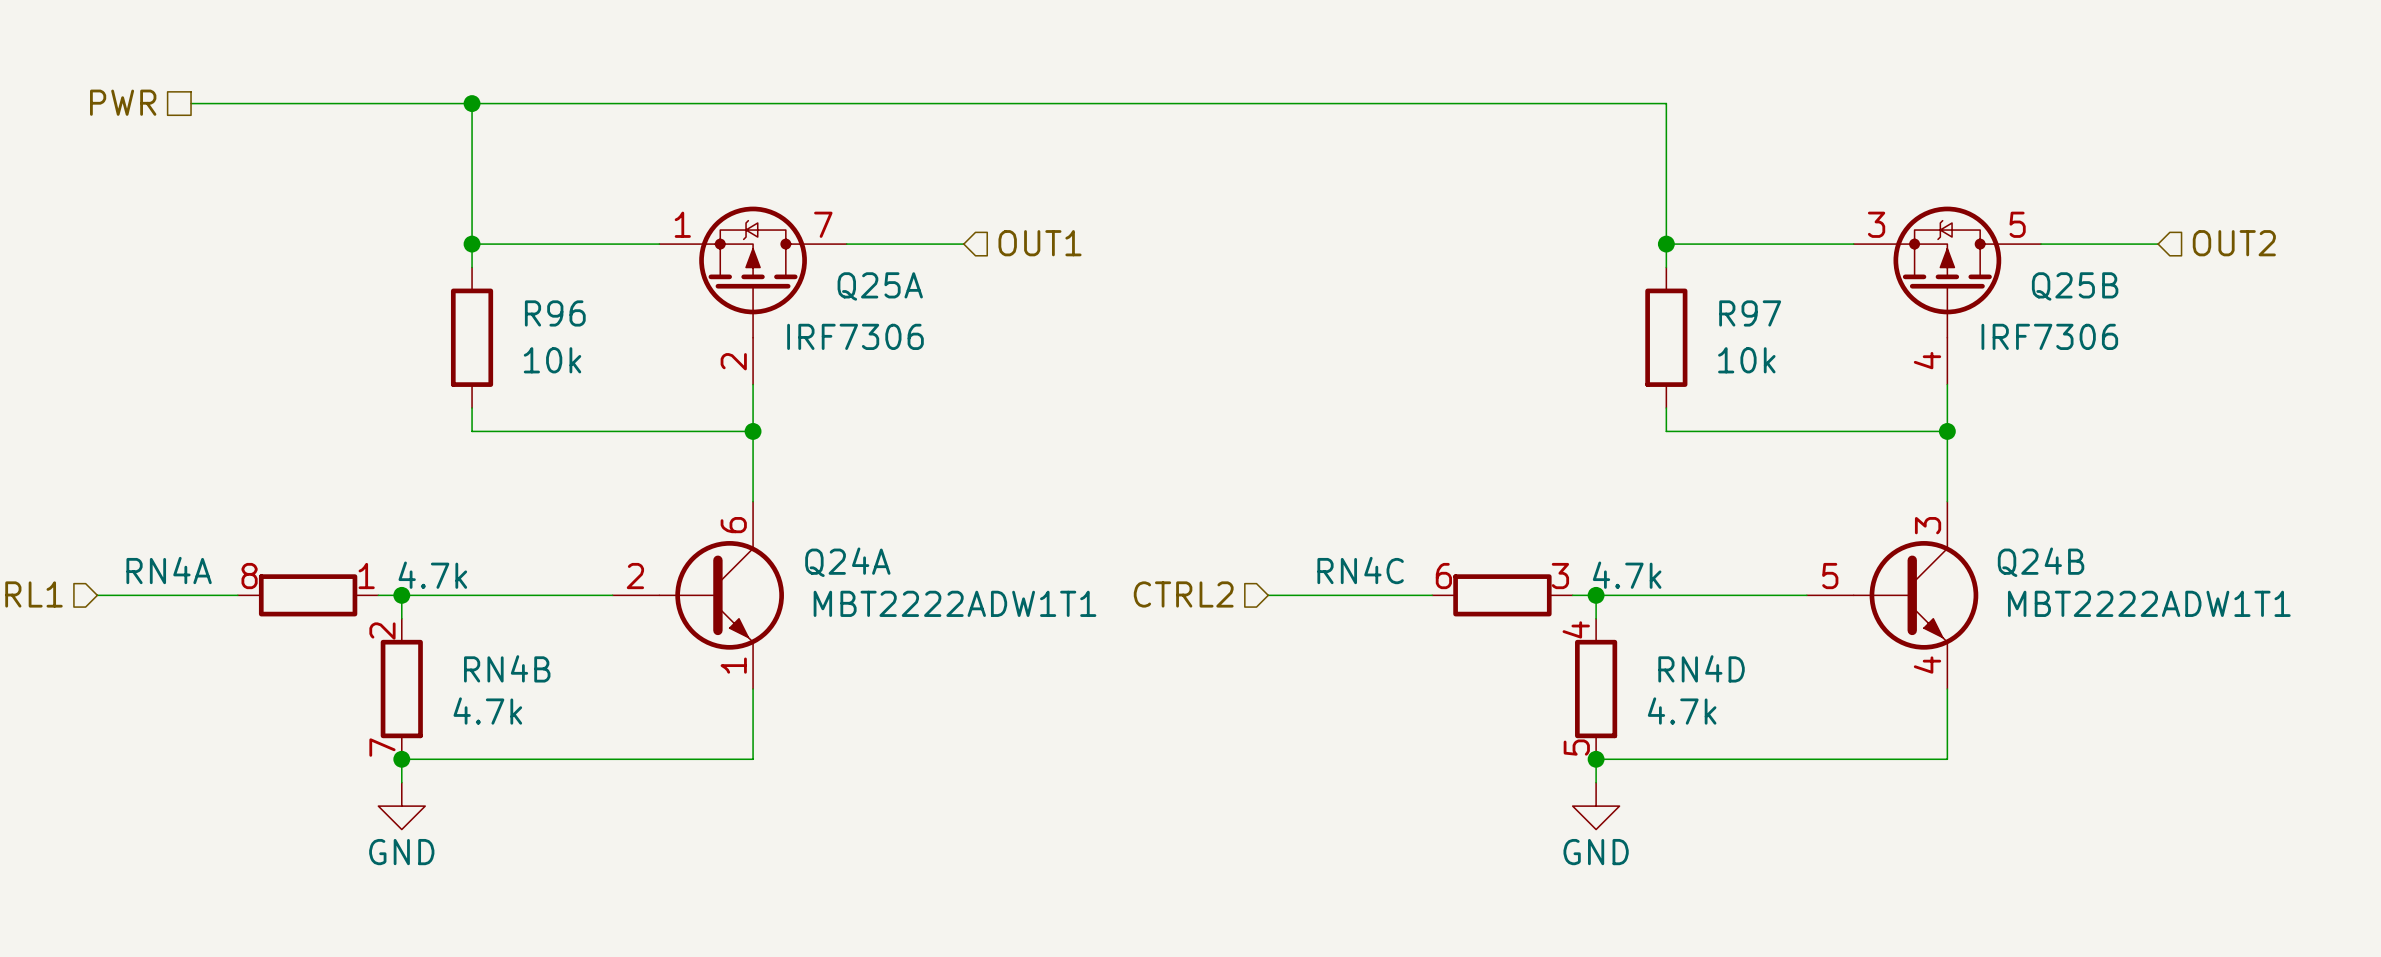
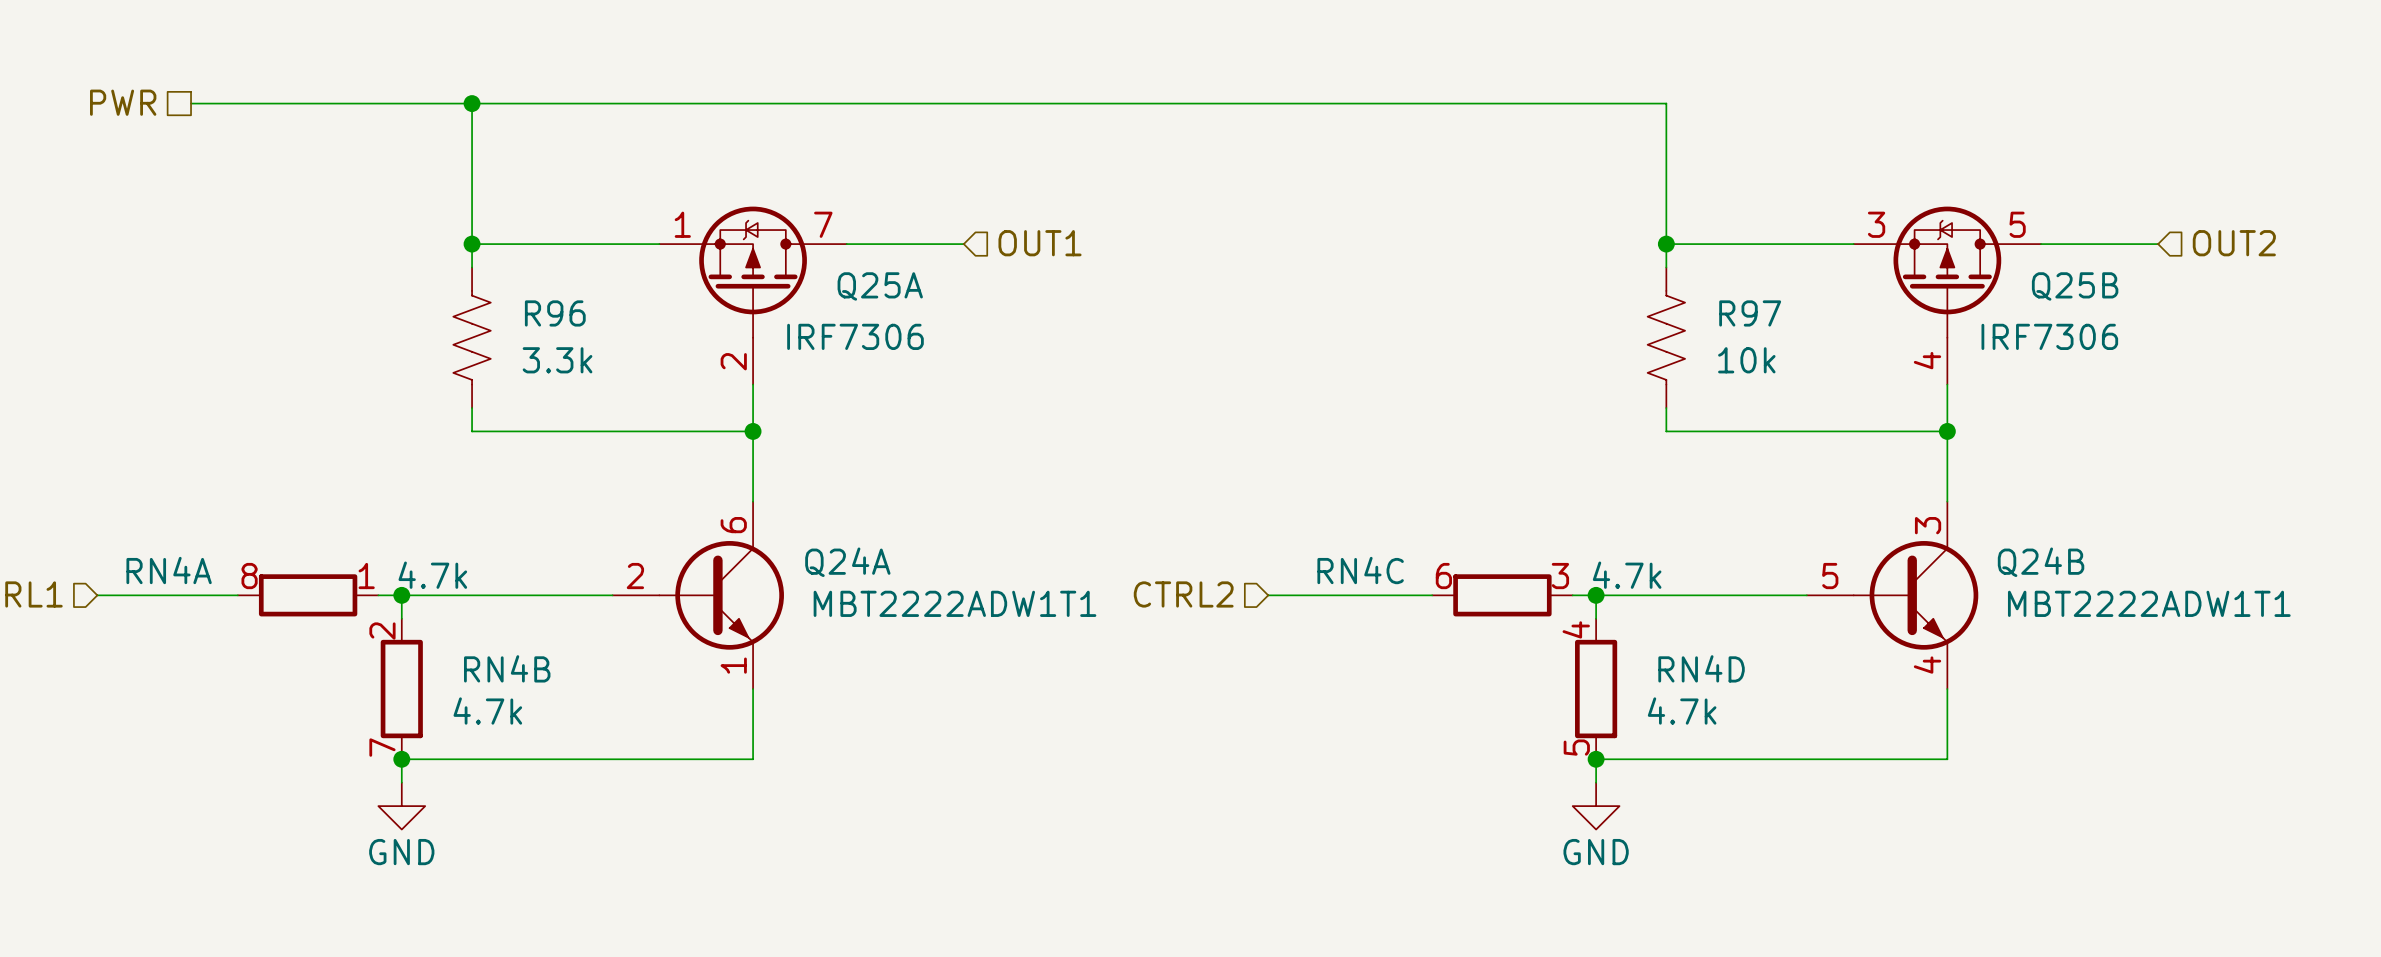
R96 symbol: [450, 267, 494, 409] -> [453, 267, 491, 409]
R97 symbol: [1645, 267, 1688, 409] -> [1647, 267, 1686, 409]
R96 value: 10k (552, 360) -> 3.3k (557, 360)

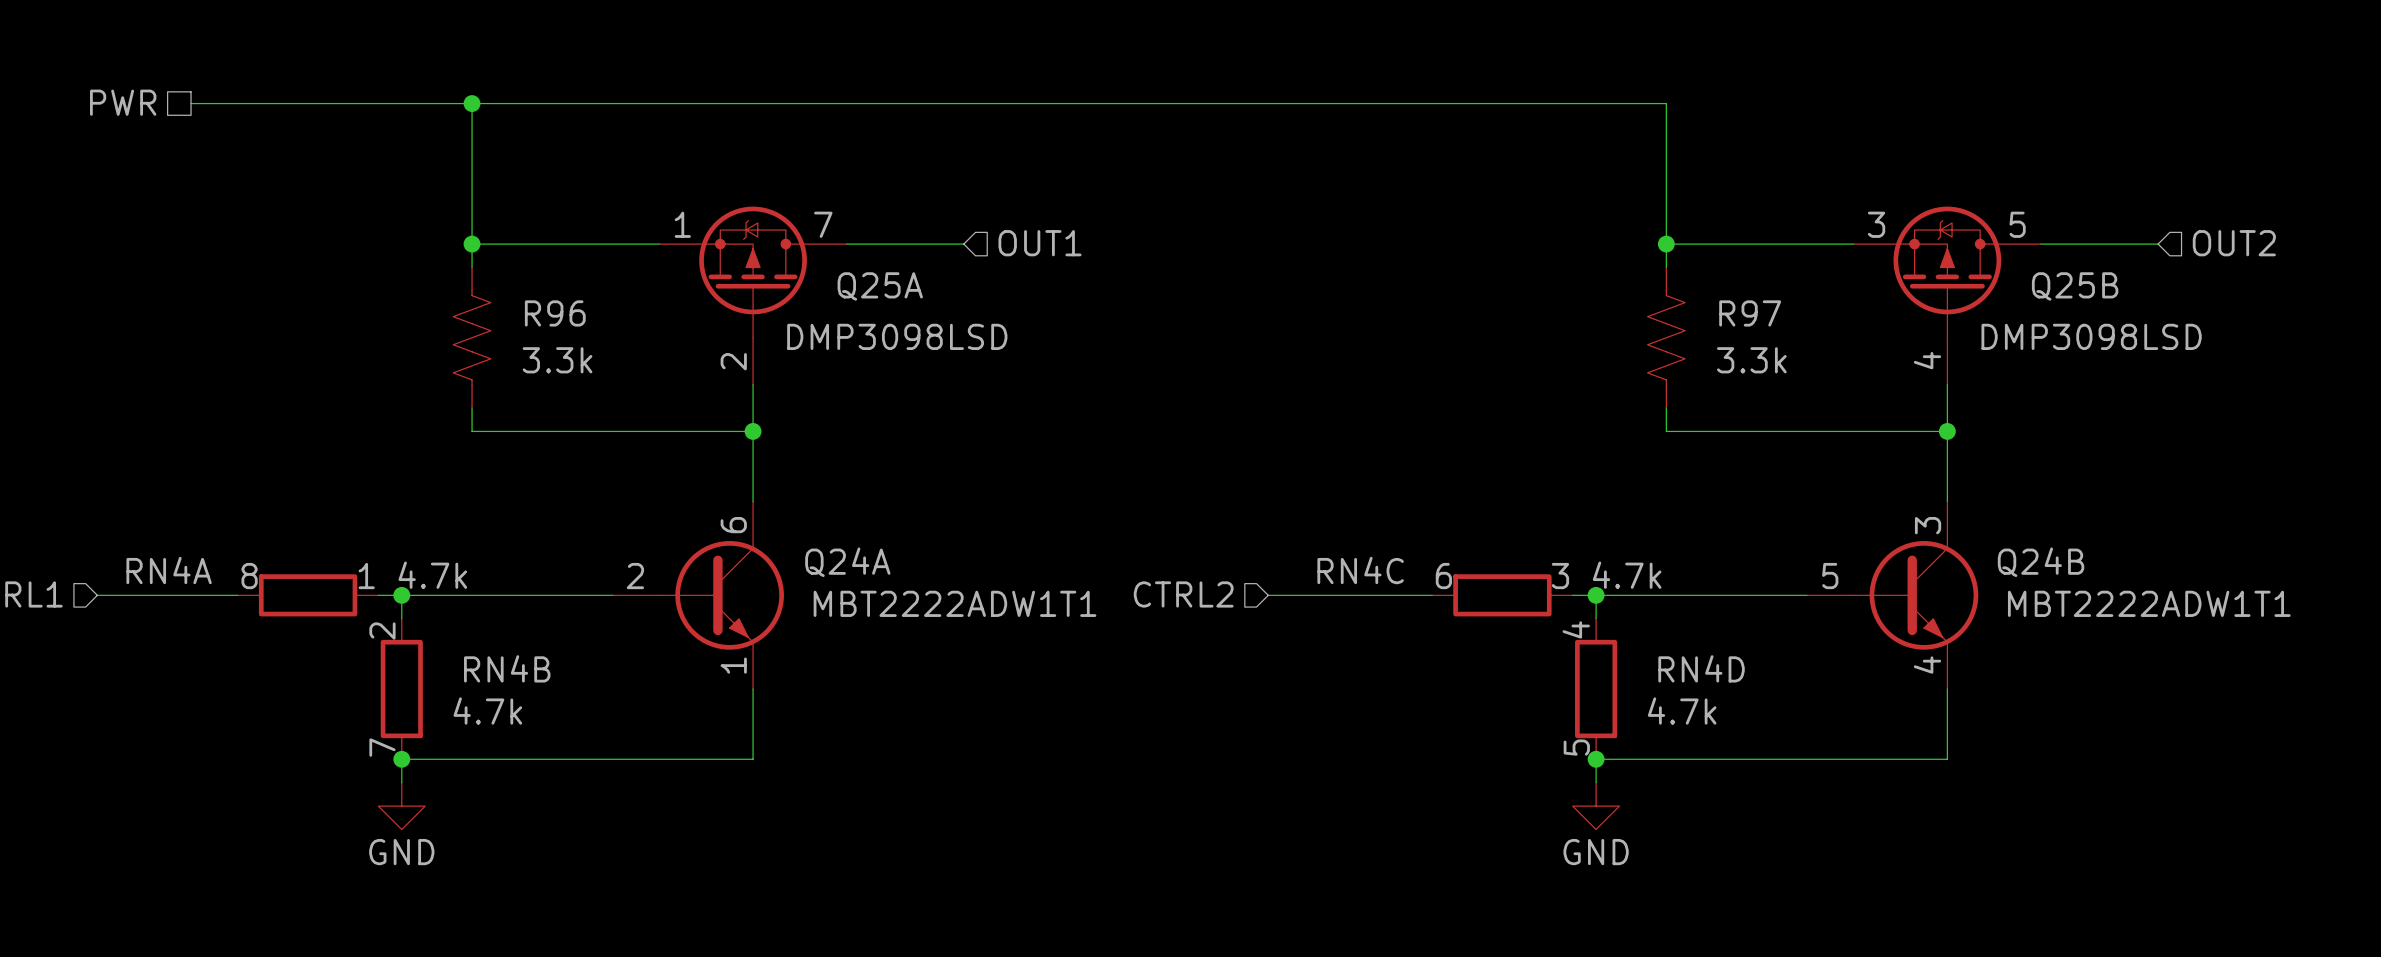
Q25A value: IRF7306 (855, 336) -> DMP3098LSD (897, 336)
Q25B value: IRF7306 (2049, 336) -> DMP3098LSD (2091, 336)
R97 value: 10k (1746, 360) -> 3.3k (1751, 360)

